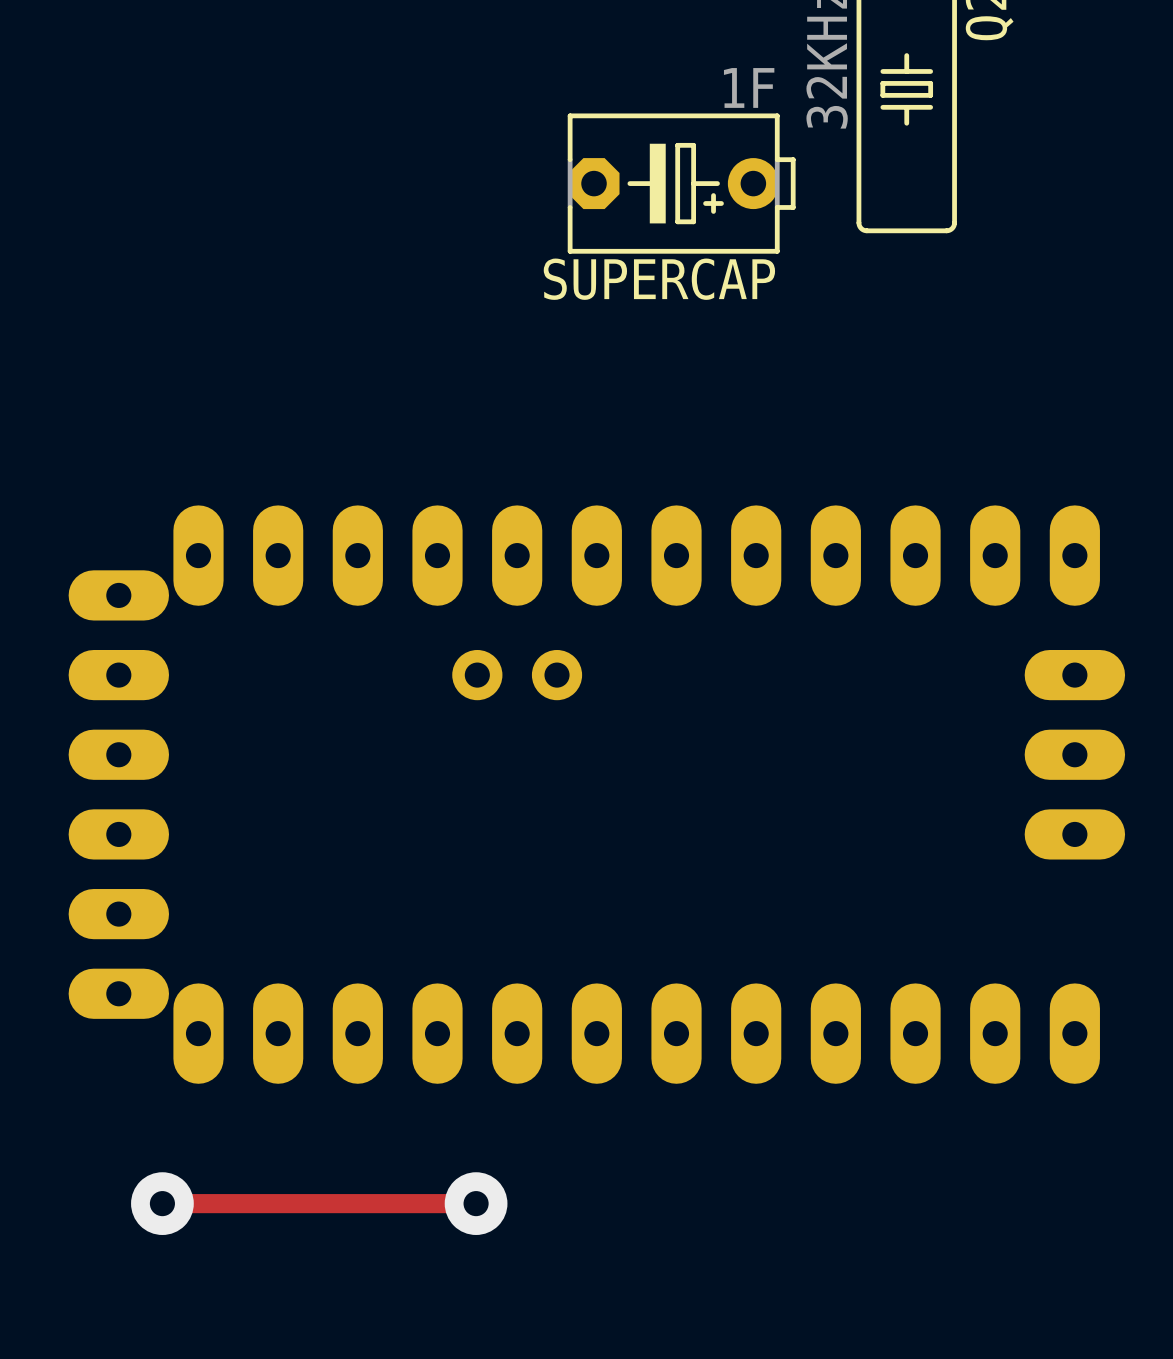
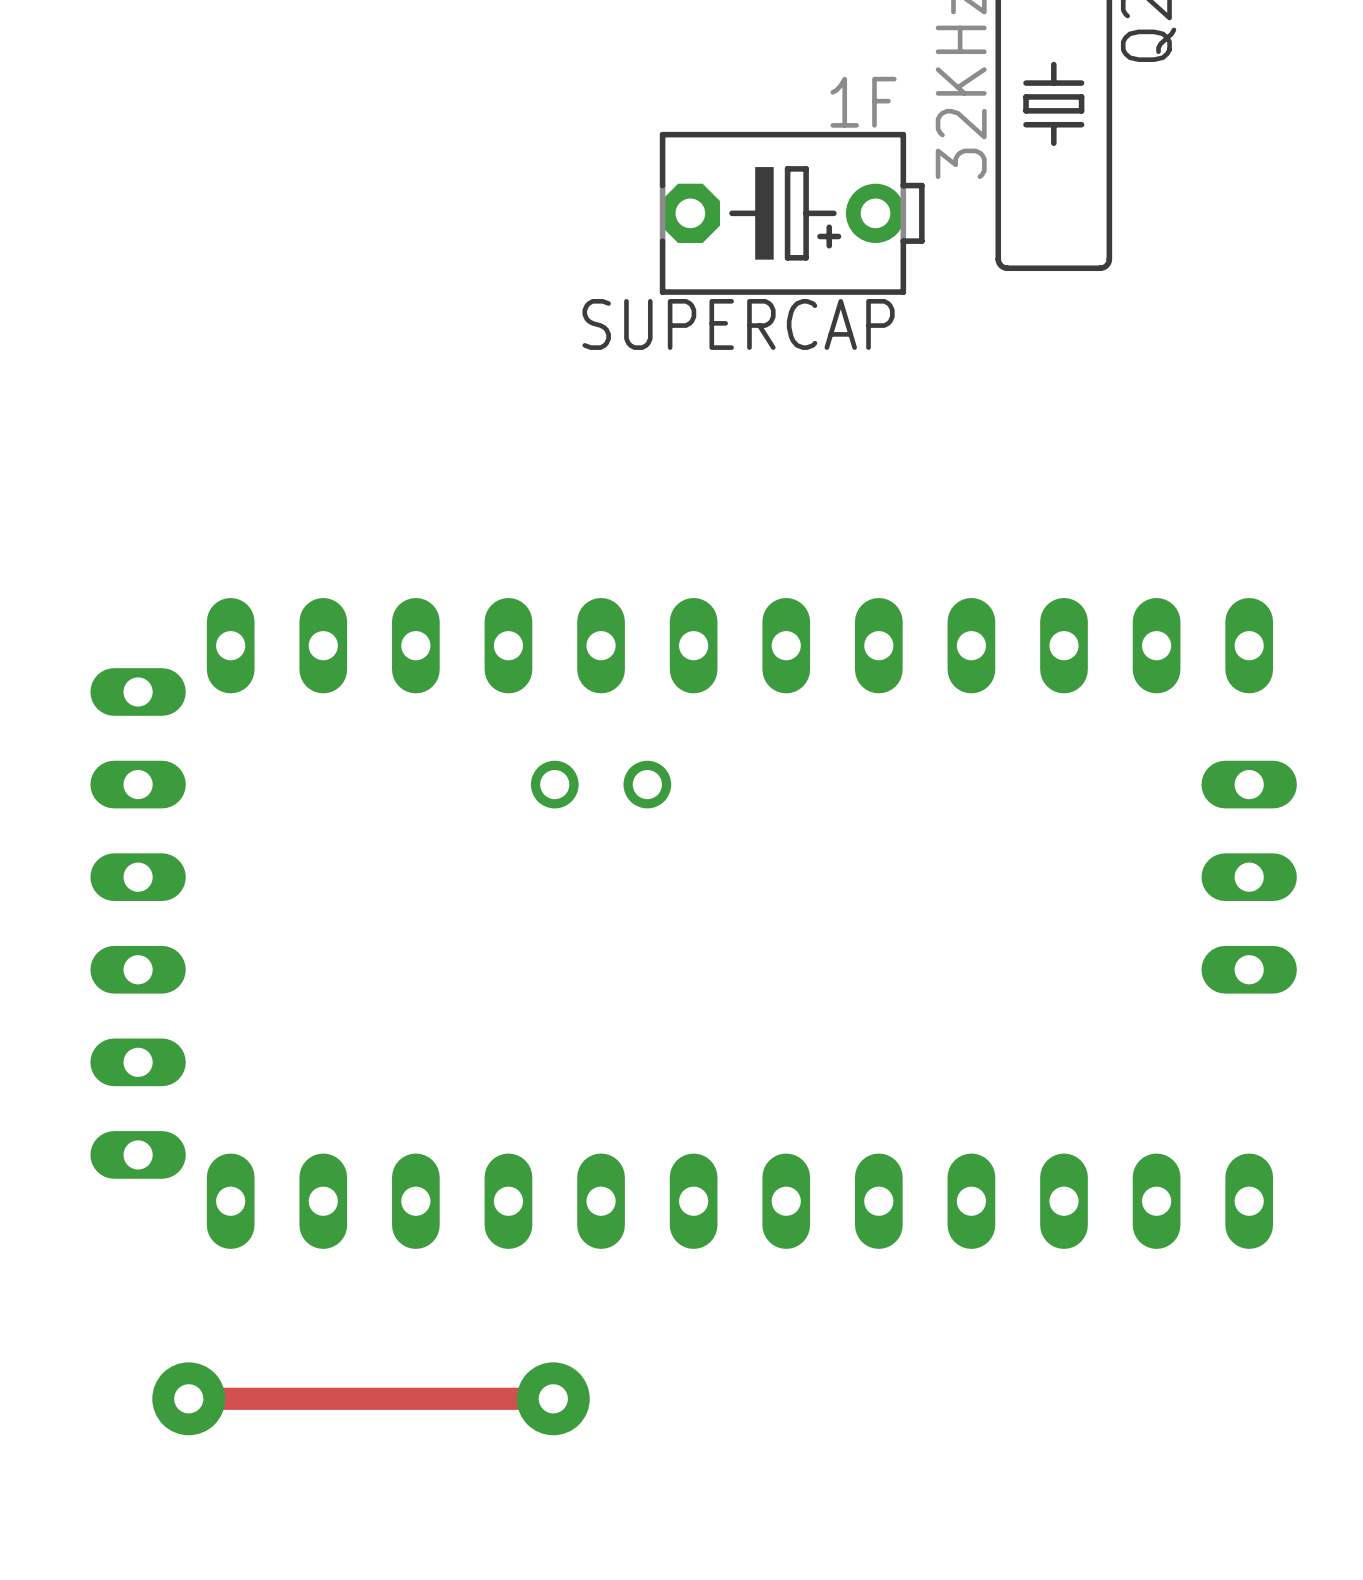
part footprint: [68, 505, 1126, 1084] -> [90, 598, 1297, 1249]

